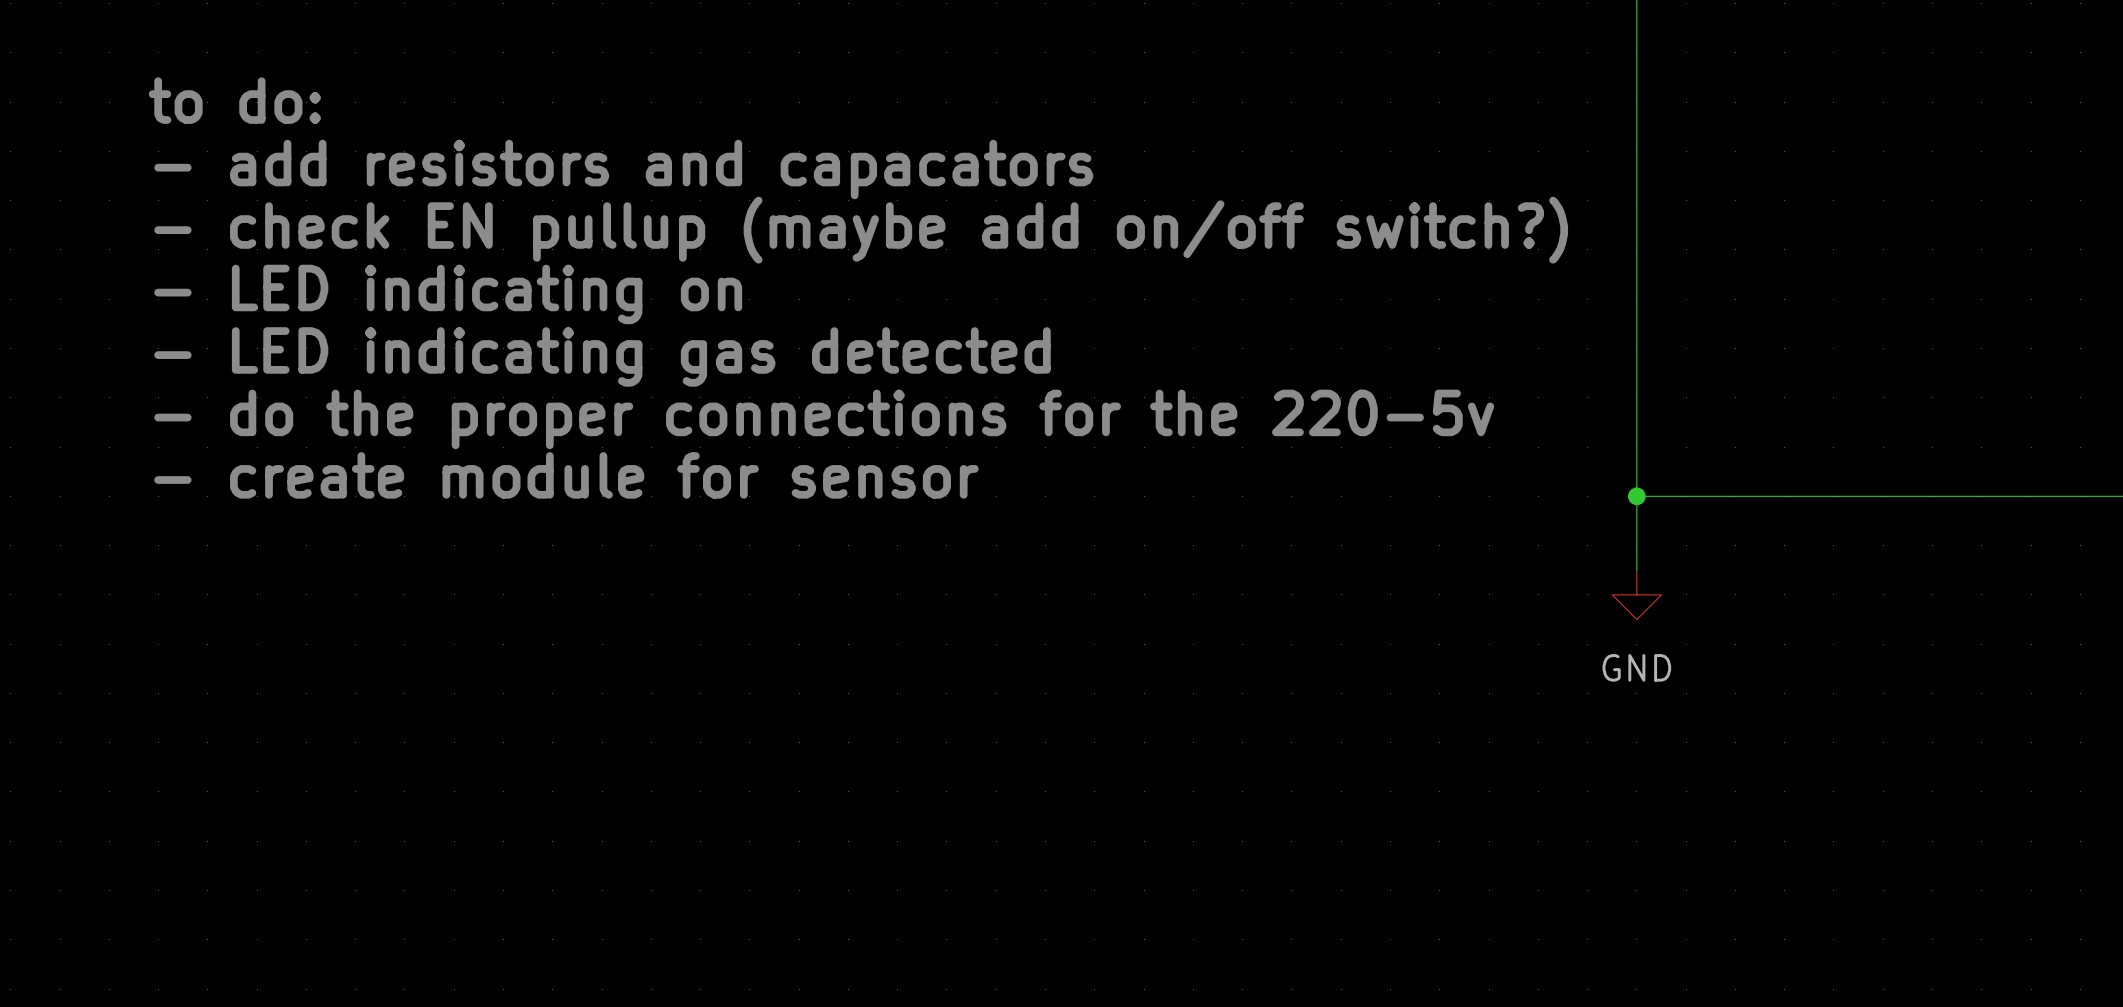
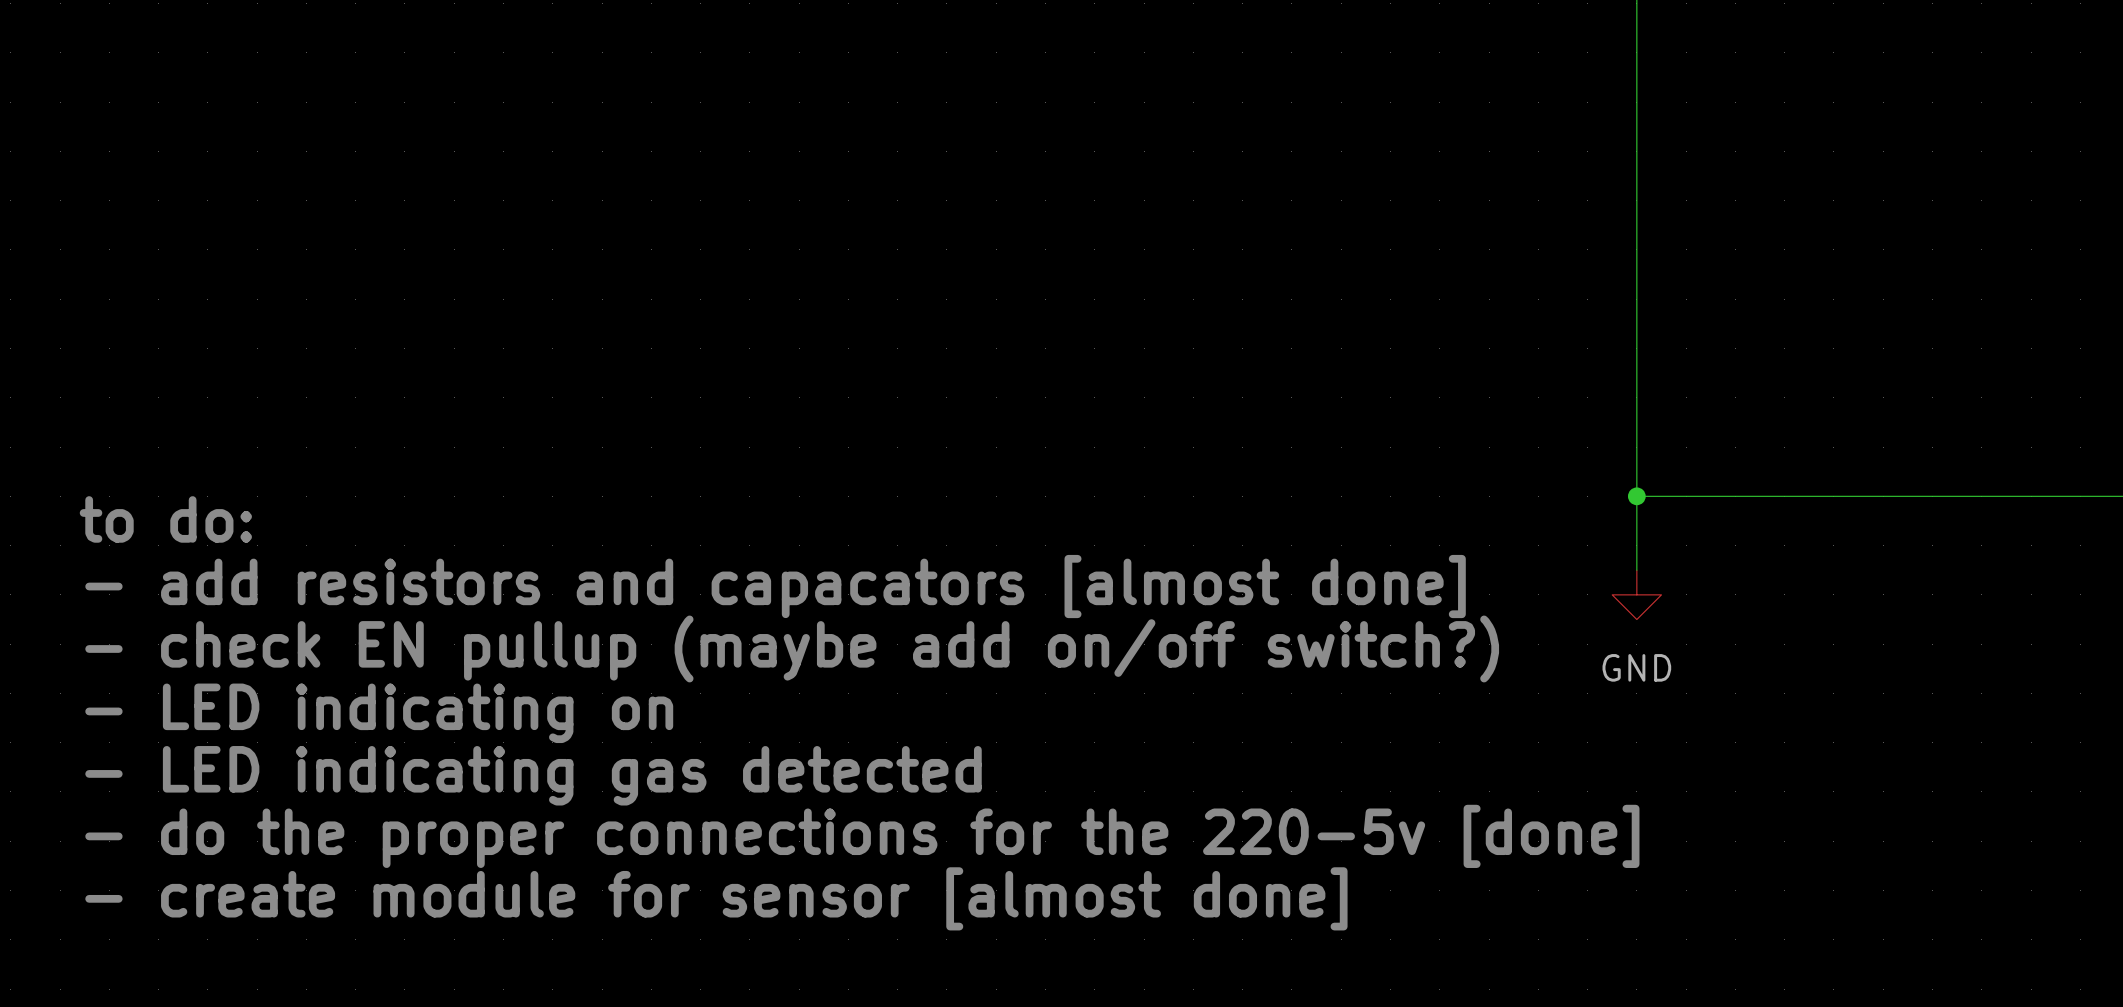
text position: to do: (234, 100) -> to do: (165, 519)
text: - add resistors and capacators (623, 169) -> none
text position: - check EN pullup (maybe add on/off switch?) (861, 230) -> - check EN pullup (maybe add on/off switch?) (792, 648)
text position: - LED indicating on (448, 294) -> - LED indicating on (379, 713)
text position: - LED indicating gas detected (602, 356) -> - LED indicating gas detected (533, 775)
text: - do the proper connections for the 220-5v (824, 419) -> none
text: - create module for sensor (566, 475) -> none
text: none -> - add resistors and capacators [almost done] (775, 586)
text: none -> - do the proper connections for the 220-5v [done] (862, 836)
text: none -> - create module for sensor [almost done] (716, 898)

